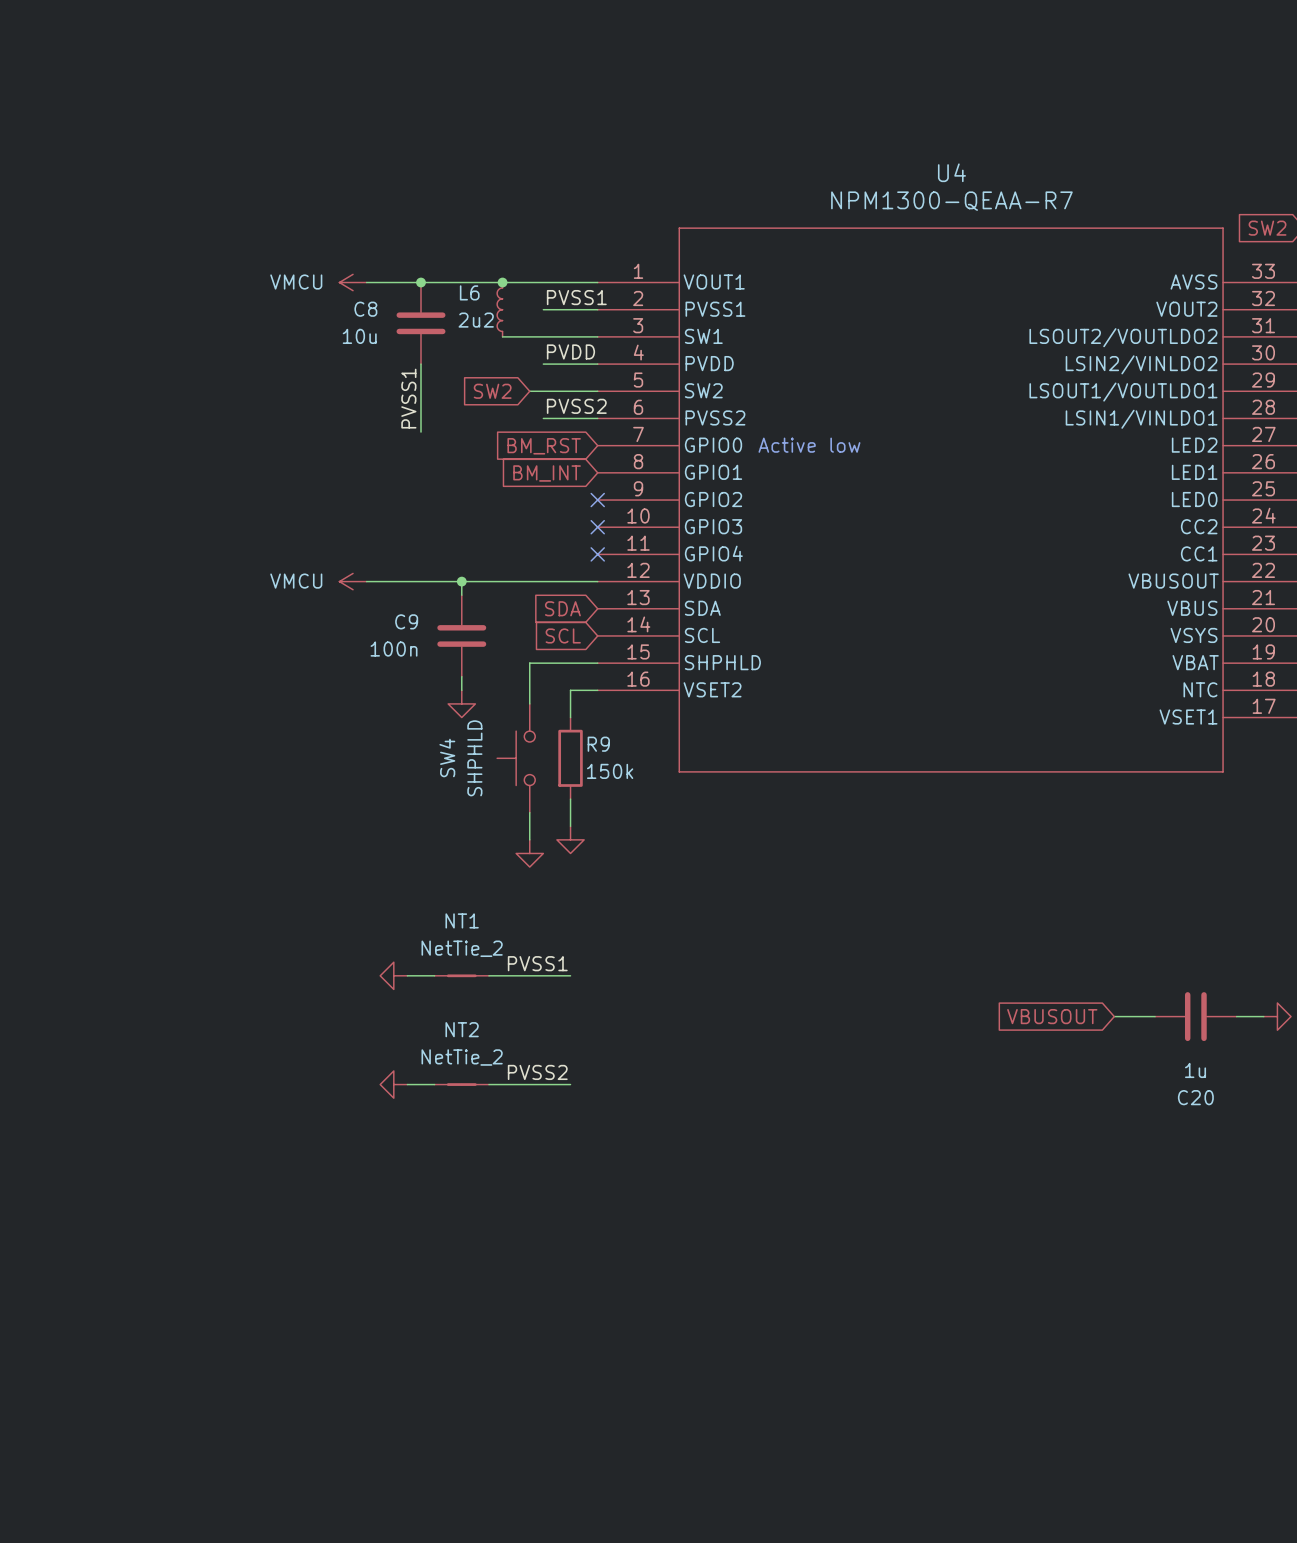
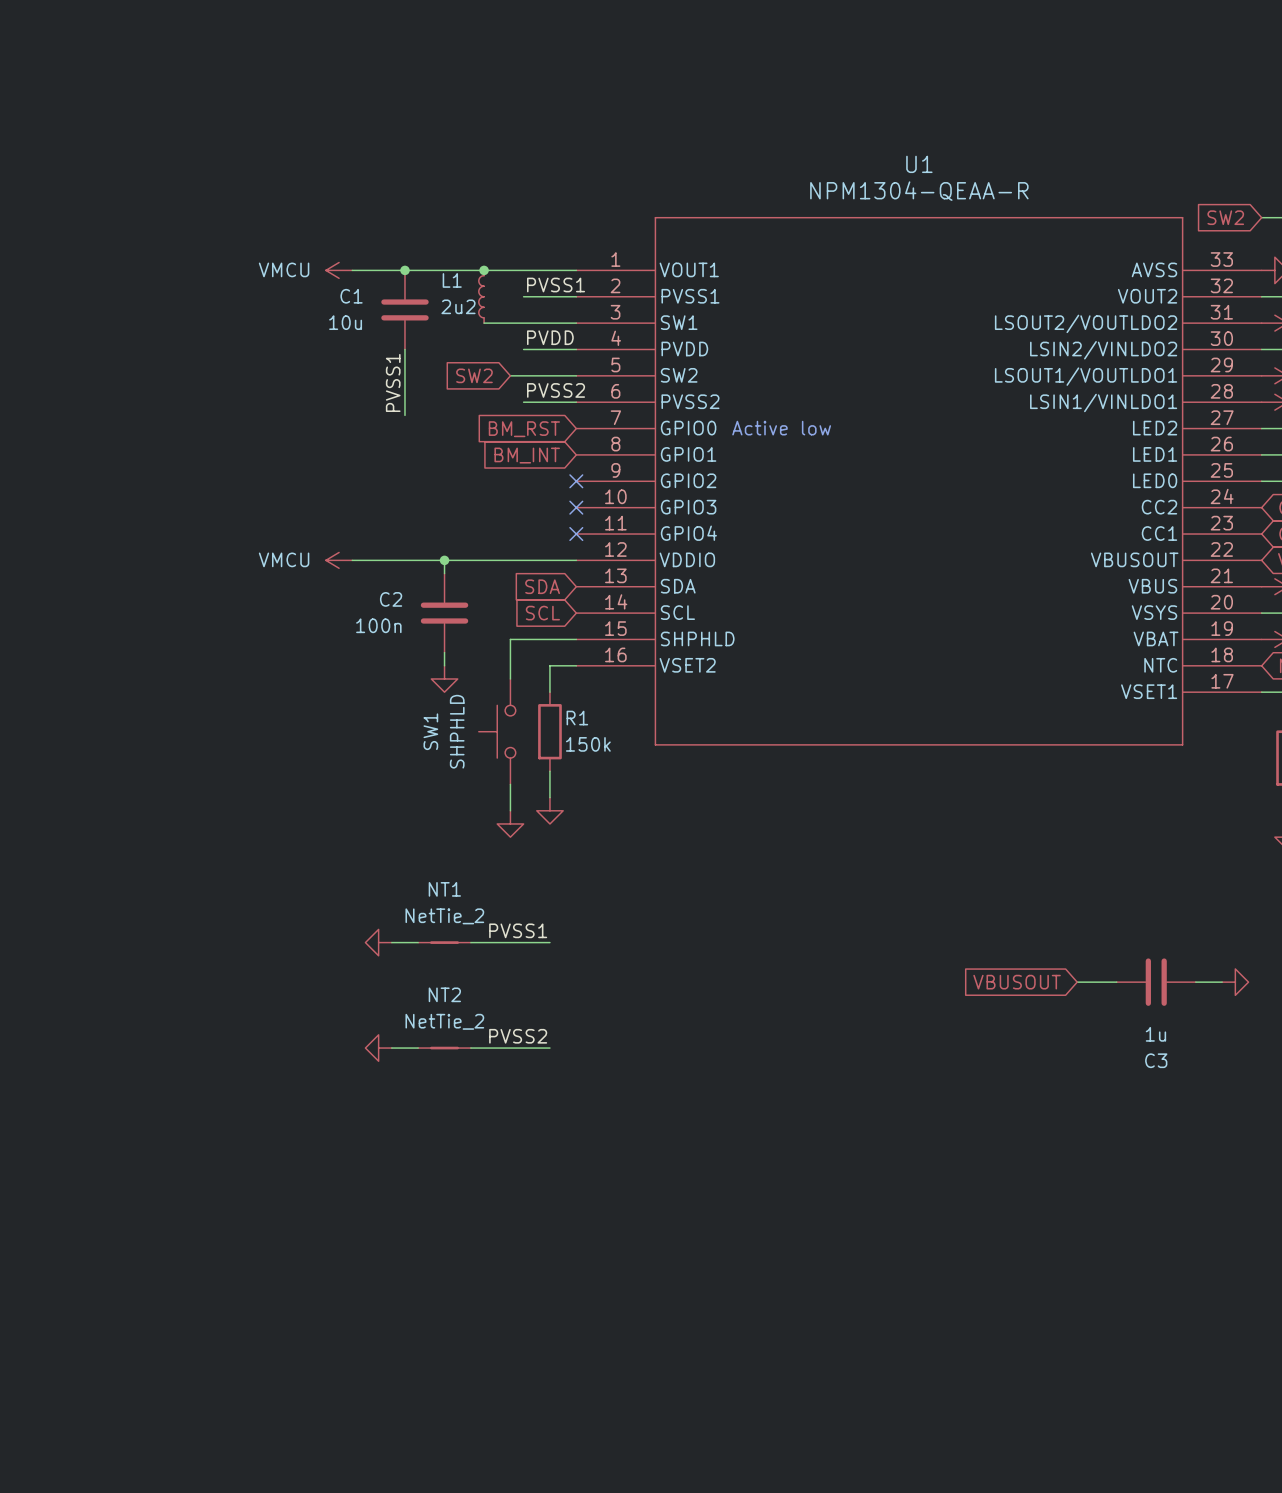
U4 name: U4 (951, 172) -> U1 (919, 164)
U4 value: NPM1300-QEAA-R7 (951, 201) -> NPM1304-QEAA-R (919, 191)
L6 name: L6 (469, 292) -> L1 (452, 280)
C8 name: C8 (365, 309) -> C1 (351, 296)
C9 name: C9 (406, 621) -> C2 (391, 599)
R9 name: R9 (598, 744) -> R1 (577, 718)
SW4 name: SW4 (447, 757) -> SW1 (430, 731)
C20 name: C20 (1195, 1097) -> C3 (1156, 1060)

